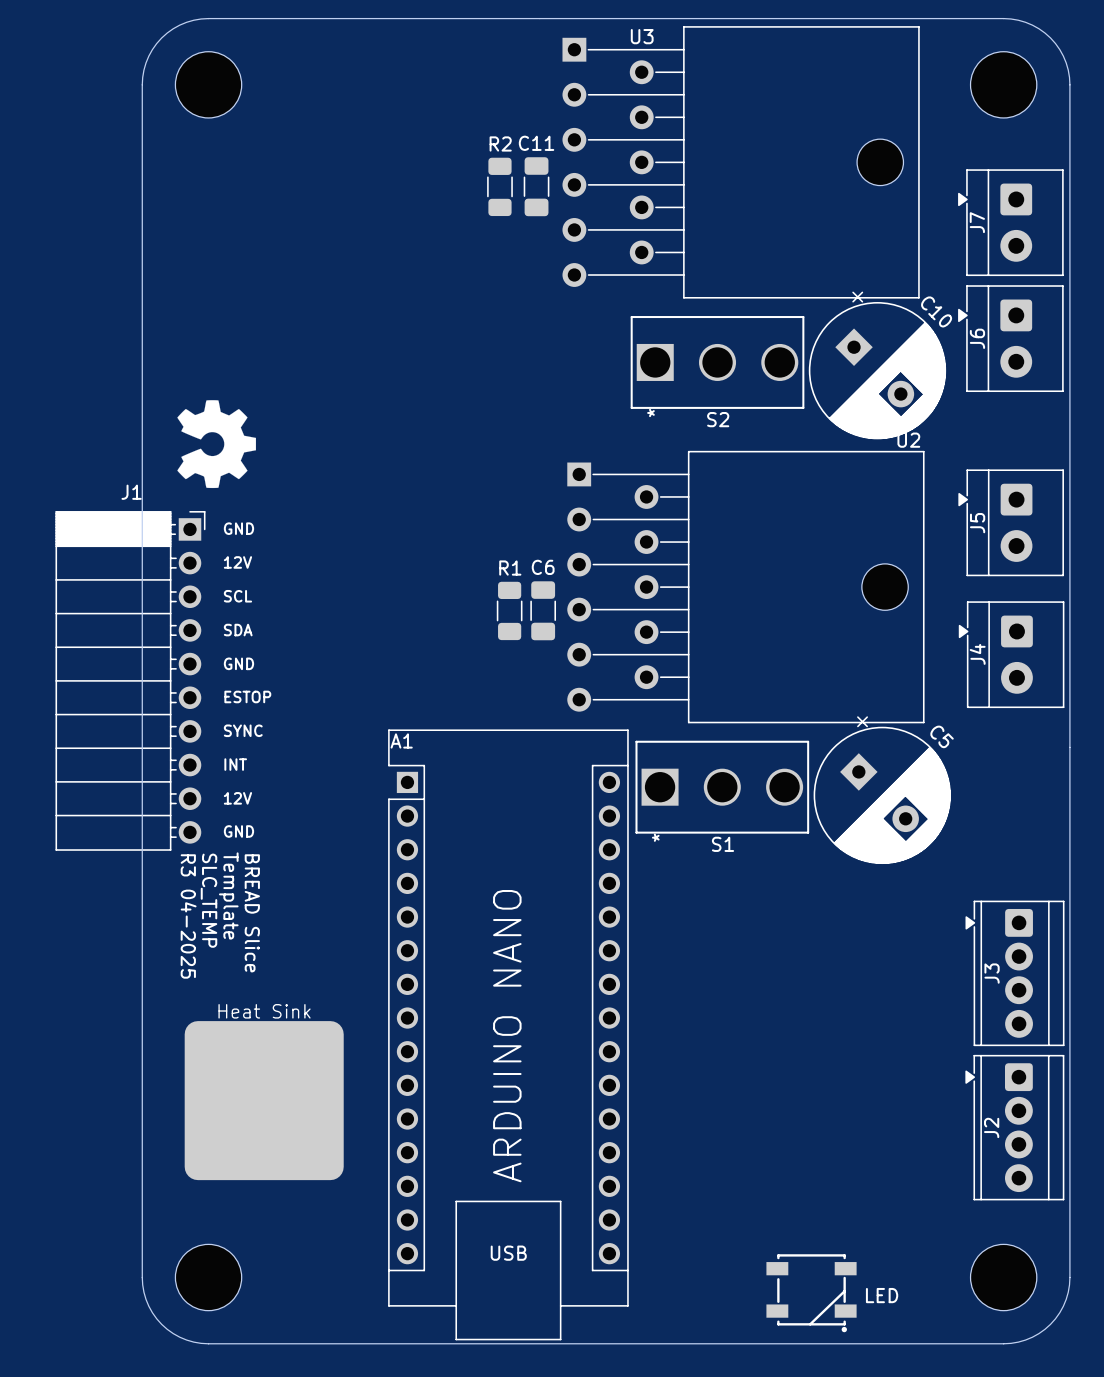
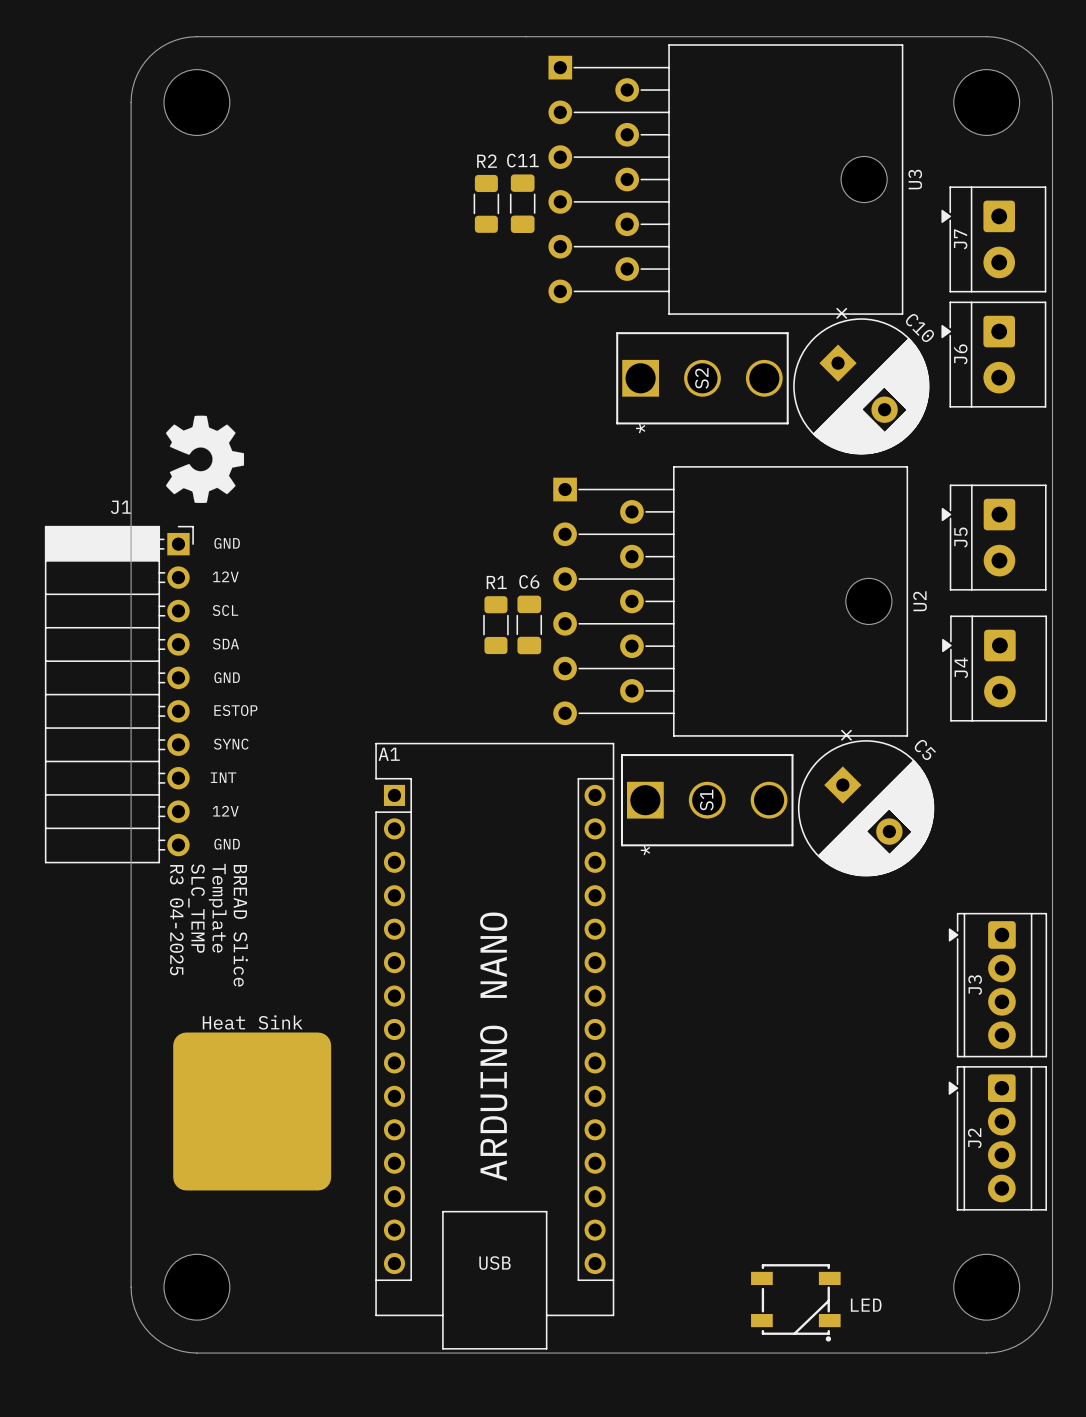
U3 name rotation: 0° (642, 36) -> 90° counterclockwise (915, 179)
U3 name position: U3 (642, 36) -> U3 (915, 179)
S2 name rotation: 0° (718, 419) -> 90° counterclockwise (701, 378)
S2 name position: S2 (718, 419) -> S2 (701, 378)
U2 name rotation: 0° (908, 440) -> 90° counterclockwise (920, 601)
U2 name position: U2 (908, 440) -> U2 (920, 601)
S1 name rotation: 0° (723, 844) -> 90° counterclockwise (706, 800)
S1 name position: S1 (723, 844) -> S1 (706, 800)

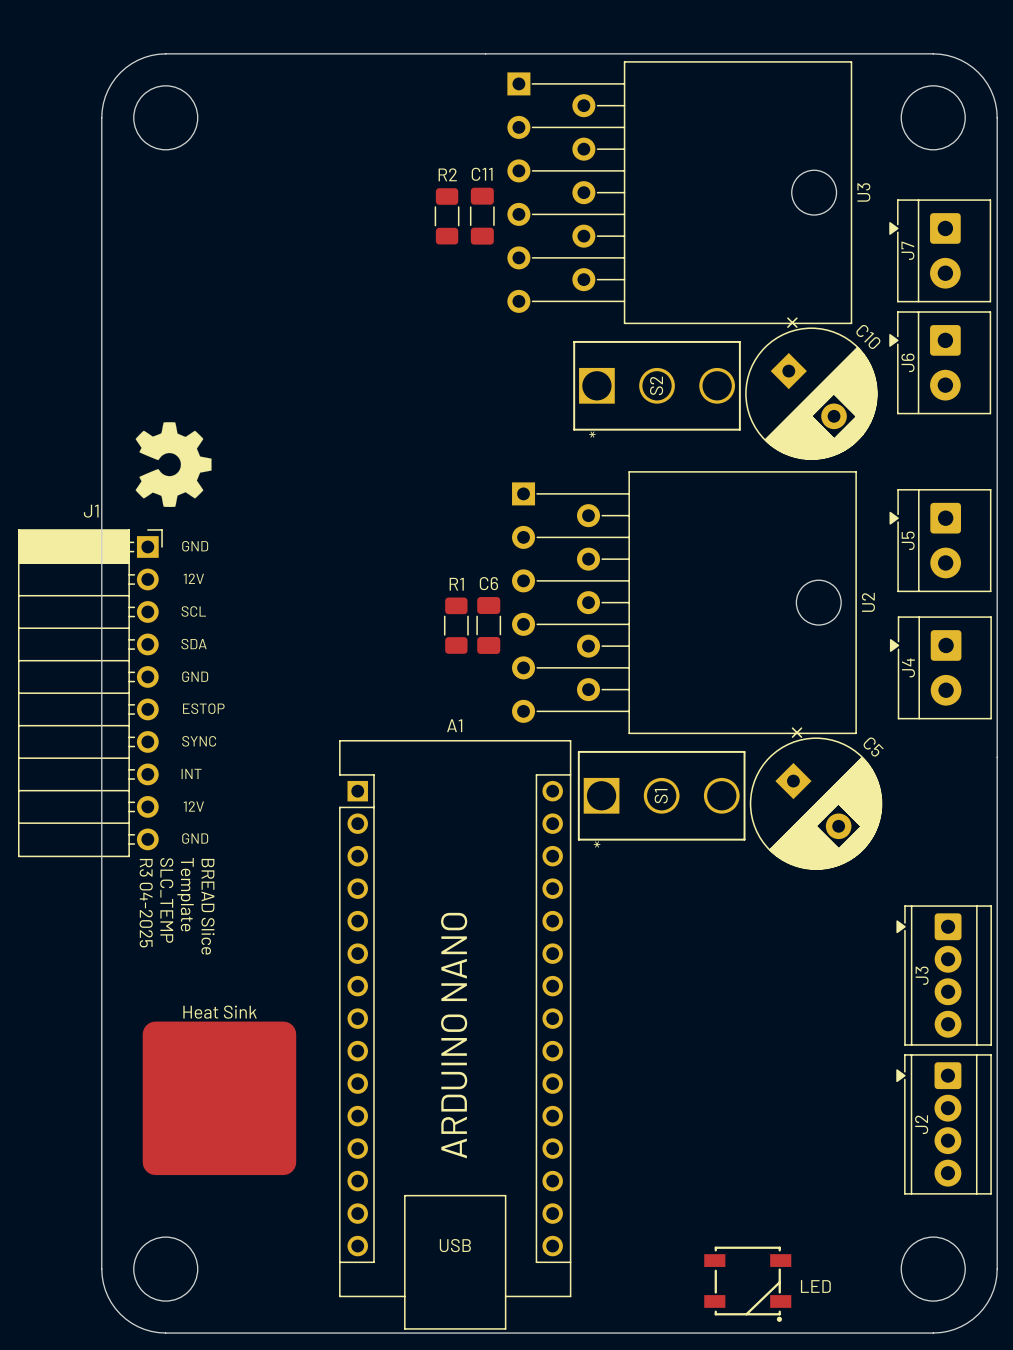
A1 name position: A1 (389, 754) -> A1 (454, 725)

